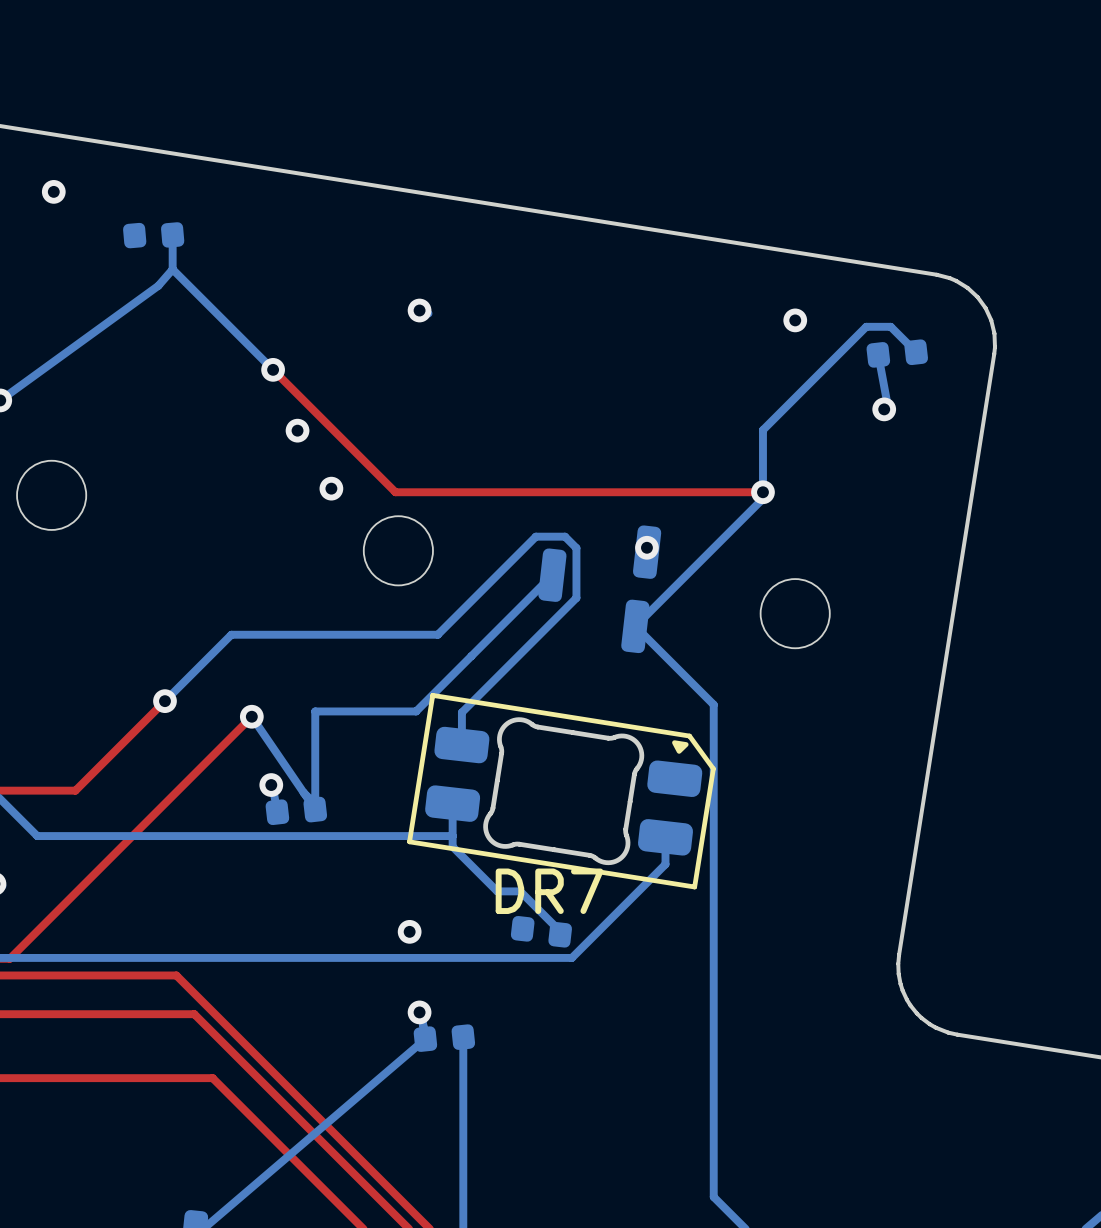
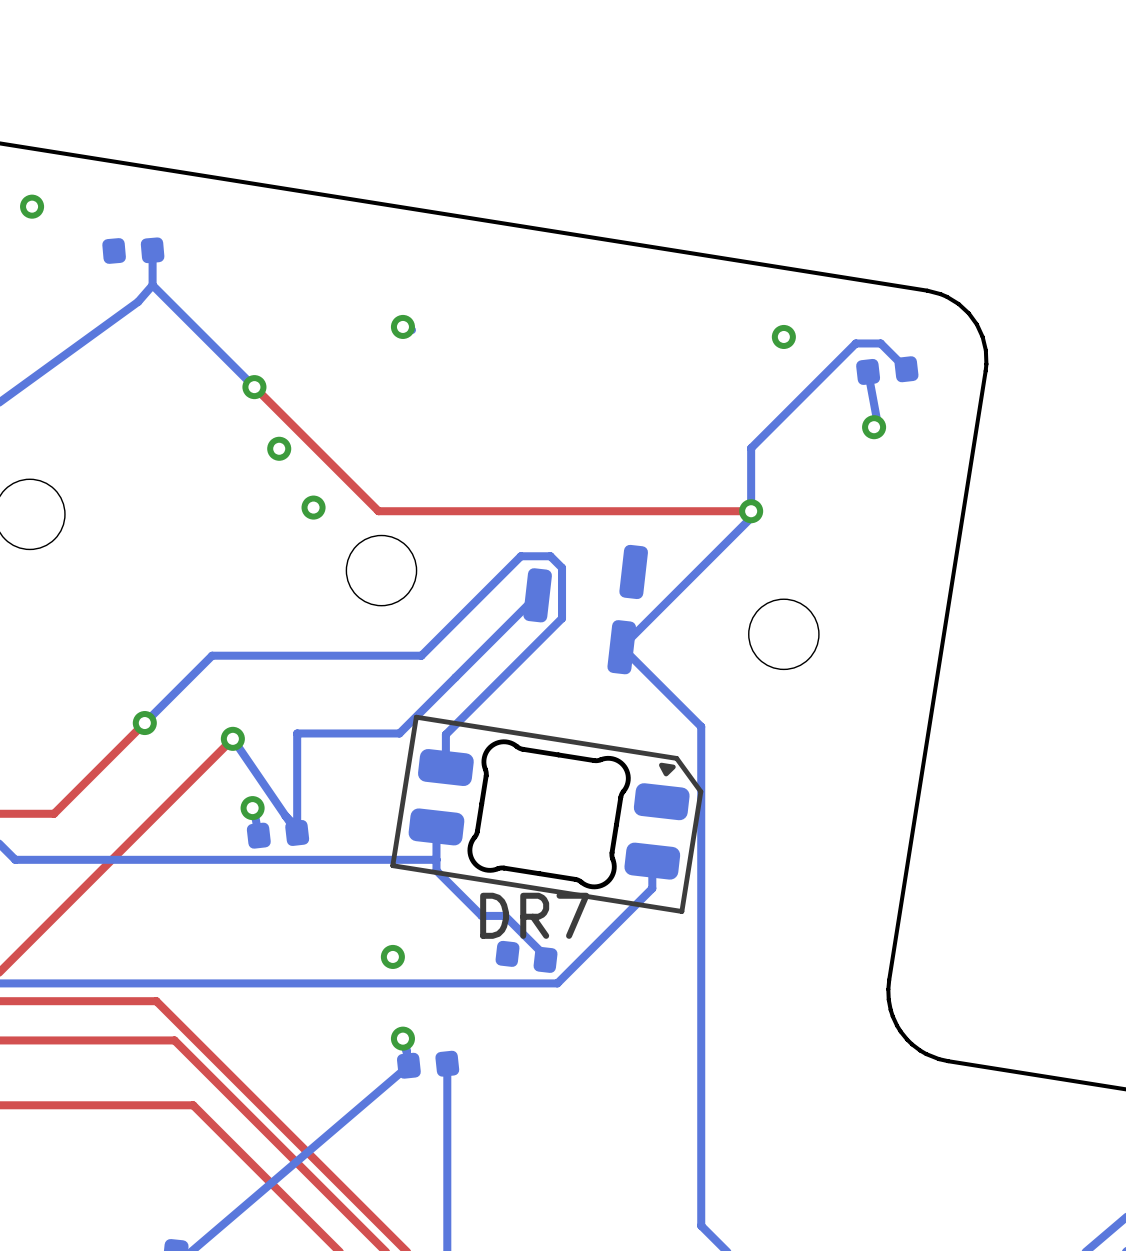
via: (646, 547) -> none

